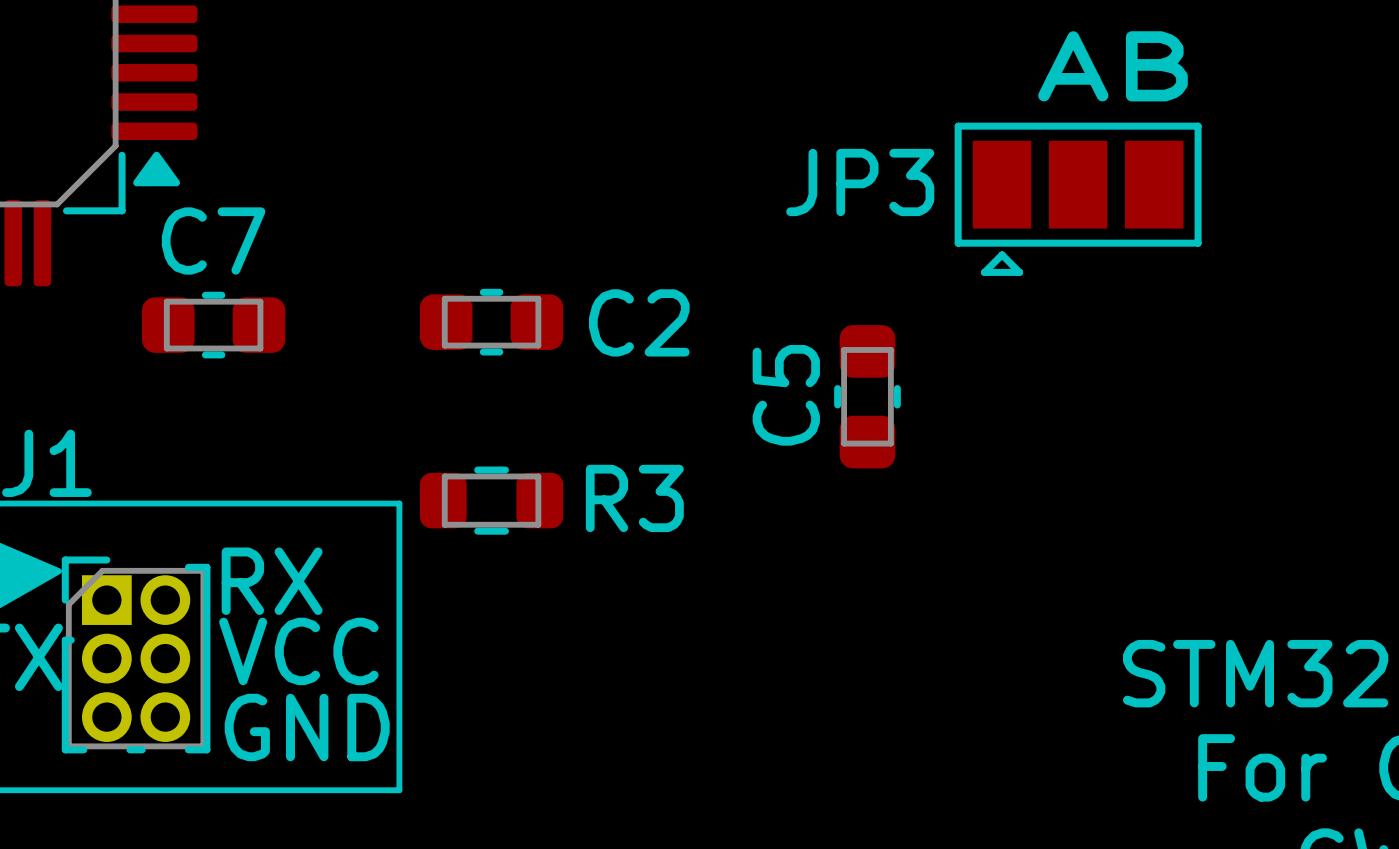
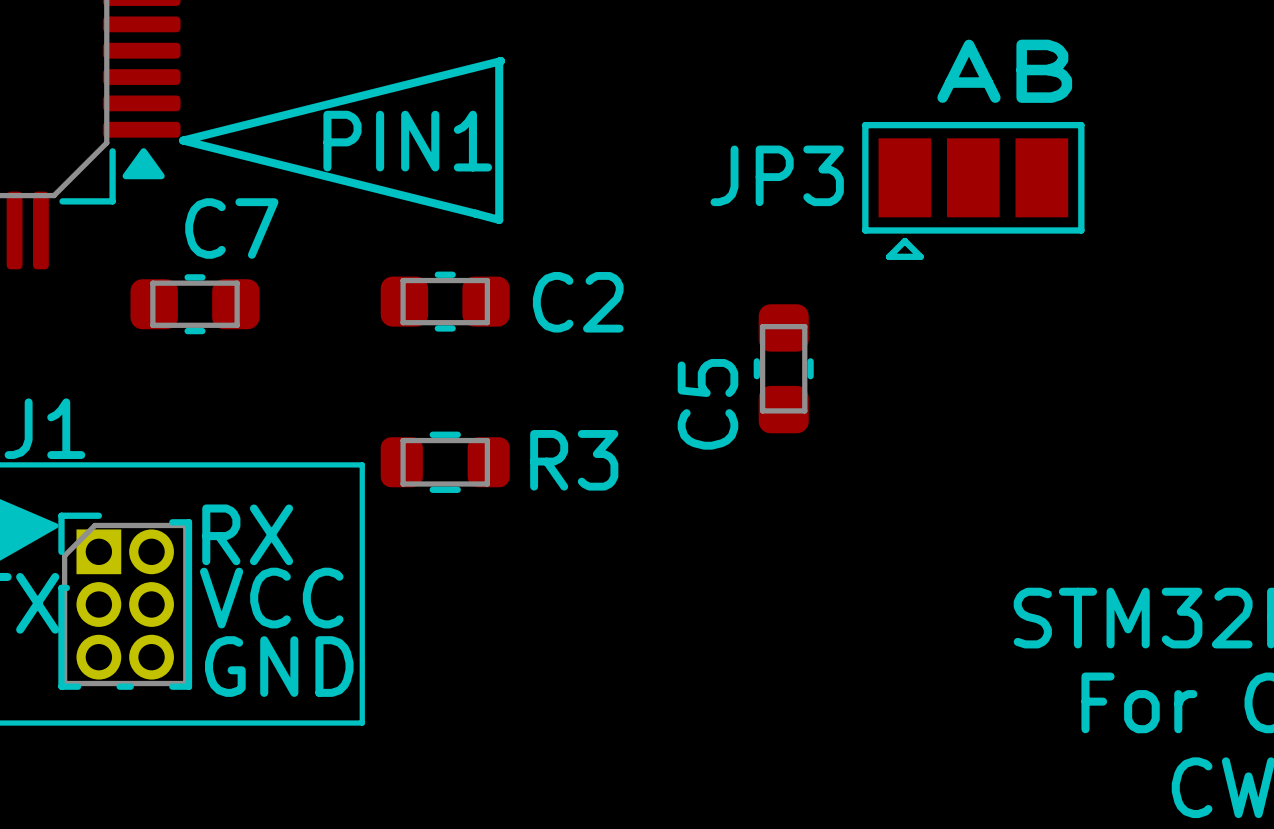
line: none -> (500, 61) (499, 61) (499, 219) (183, 140) (500, 61)
text: none -> PIN1 (407, 141)
C7 name position: C7 (213, 240) -> C7 (231, 228)
C5 name position: C5 (786, 395) -> C5 (707, 404)

